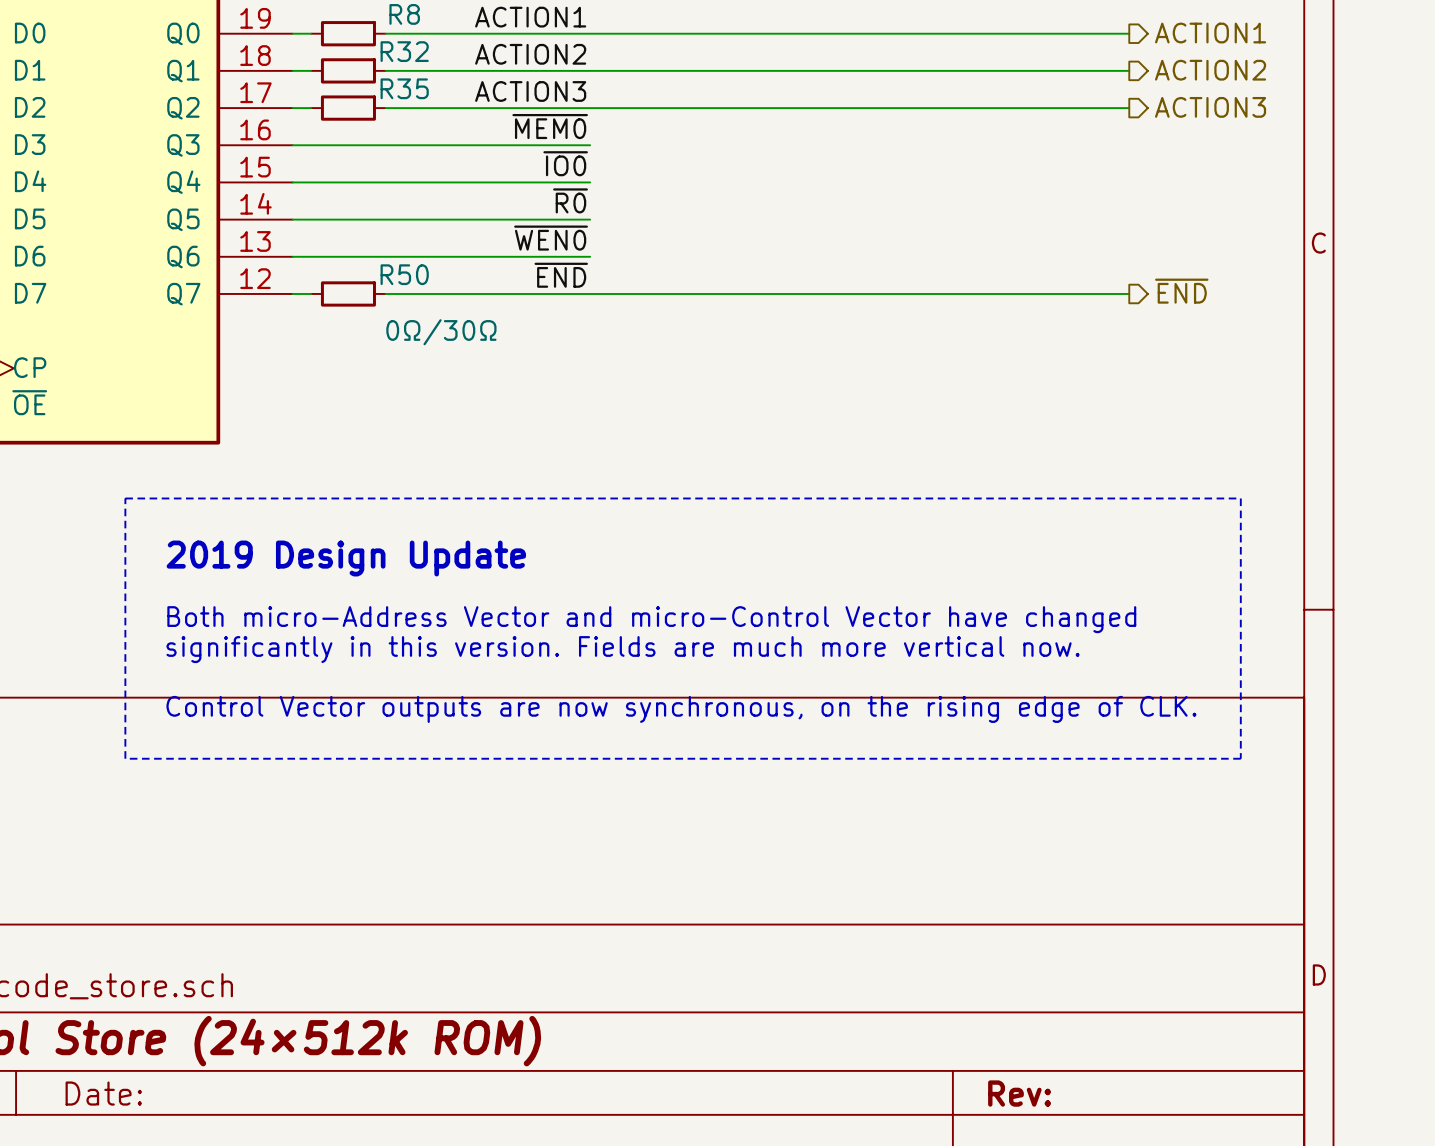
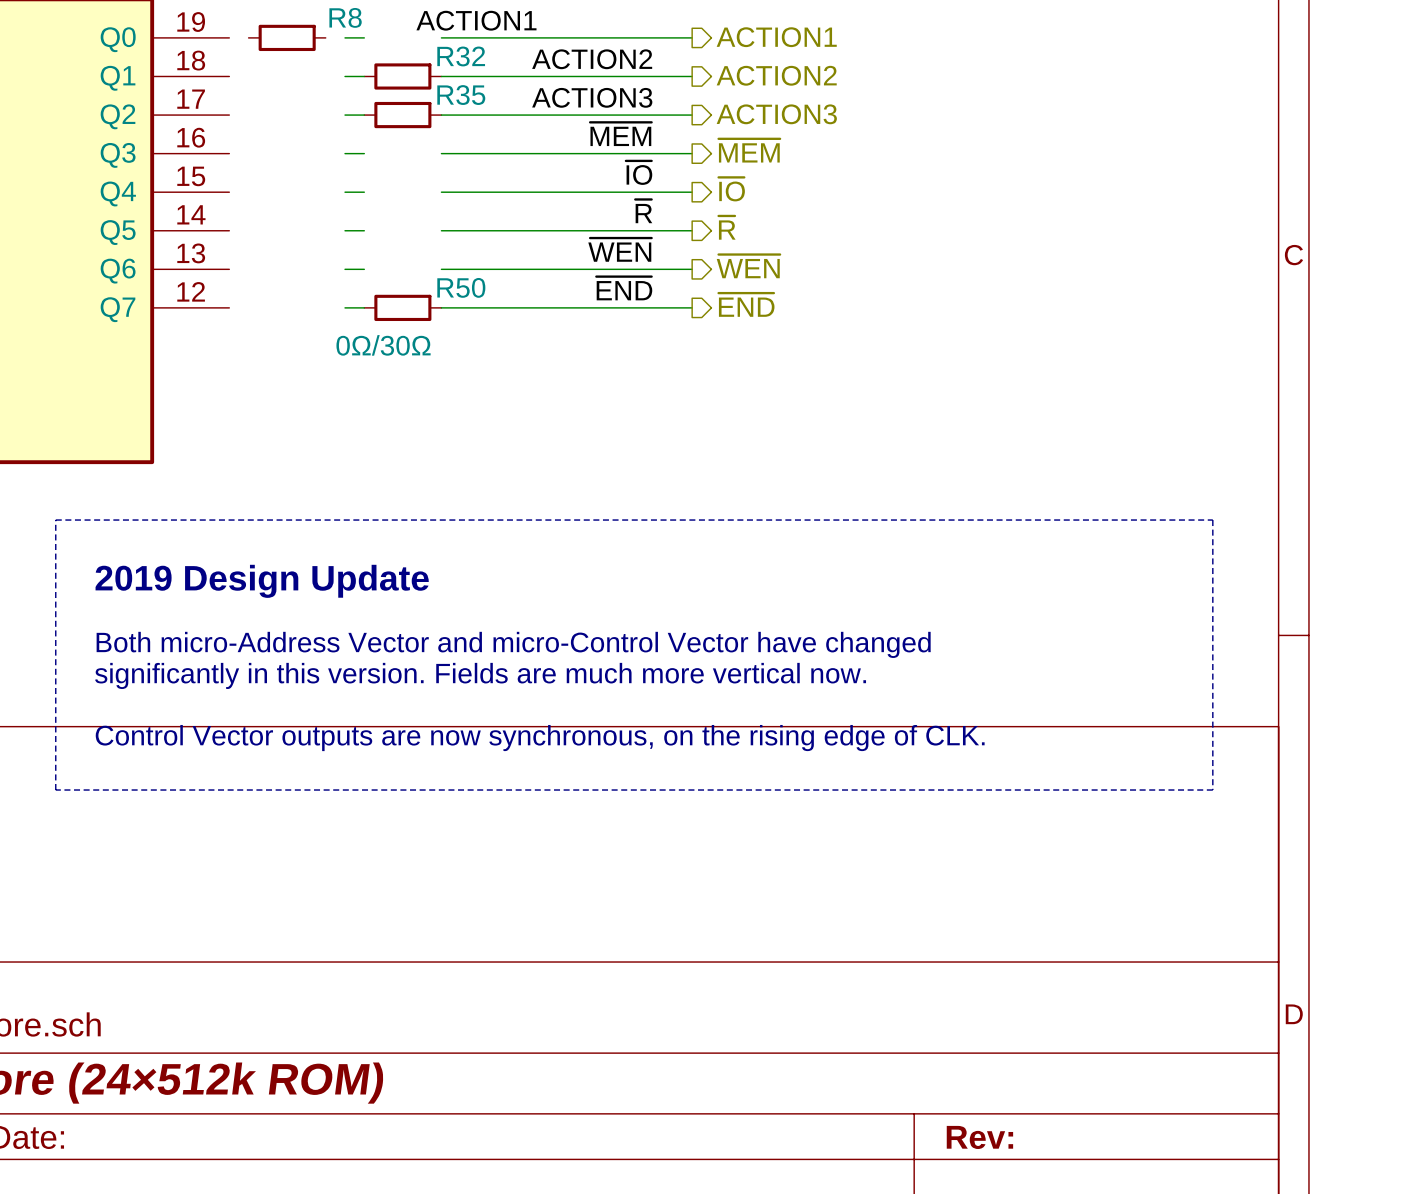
wire: (292, 33) (311, 33) -> none
wire: (385, 33) (404, 33) -> none
wire: (422, 33) (497, 33) -> none
wire: (738, 33) (1129, 33) -> none
hierarchical label: none -> ACTION1 (776, 37)
hierarchical label: ACTION1 (1210, 33) -> none
label position: ACTION2 (530, 54) -> ACTION2 (592, 59)
wire: (292, 70) (311, 70) -> none
R32 position: (348, 70) -> (402, 76)
wire: (385, 70) (404, 70) -> none
wire: (422, 70) (497, 70) -> none
wire: (738, 70) (1129, 70) -> none
hierarchical label: none -> ACTION2 (776, 75)
hierarchical label: ACTION2 (1210, 70) -> none
label position: ACTION3 (530, 91) -> ACTION3 (592, 97)
hierarchical label: none -> ACTION3 (776, 114)
hierarchical label: ACTION3 (1210, 107) -> none
wire: (292, 108) (311, 108) -> none
R35 position: (348, 108) -> (402, 115)
wire: (385, 108) (404, 108) -> none
wire: (422, 108) (497, 108) -> none
wire: (738, 108) (1129, 108) -> none
label: ~{MEM0} (550, 126) -> ~{MEM} (620, 134)
hierarchical label: none -> ~{MEM} (749, 150)
wire: (292, 145) (404, 145) -> none
wire: (422, 145) (497, 145) -> none
wire: none -> (537, 153) (692, 153)
label: ~{IO0} (565, 163) -> none
label: none -> ~{IO} (639, 172)
hierarchical label: none -> ~{IO} (731, 189)
wire: (292, 182) (404, 182) -> none
wire: (422, 182) (497, 182) -> none
wire: none -> (537, 192) (692, 192)
label: ~{R0} (570, 200) -> none
label: none -> ~{R} (643, 211)
hierarchical label: none -> ~{R} (727, 227)
wire: (292, 219) (404, 219) -> none
wire: (422, 219) (497, 219) -> none
wire: none -> (537, 230) (692, 230)
label: ~{WEN0} (551, 238) -> ~{WEN} (619, 249)
hierarchical label: none -> ~{WEN} (748, 266)
wire: (292, 256) (404, 256) -> none
wire: (422, 256) (497, 256) -> none
wire: none -> (537, 269) (692, 269)
label position: ~{END} (561, 275) -> ~{END} (624, 288)
hierarchical label: none -> ~{END} (746, 304)
hierarchical label: ~{END} (1181, 291) -> none
wire: (292, 293) (311, 293) -> none
R50 position: (348, 293) -> (402, 307)
wire: (385, 293) (404, 293) -> none
wire: (422, 293) (497, 293) -> none
wire: (738, 293) (1129, 293) -> none

